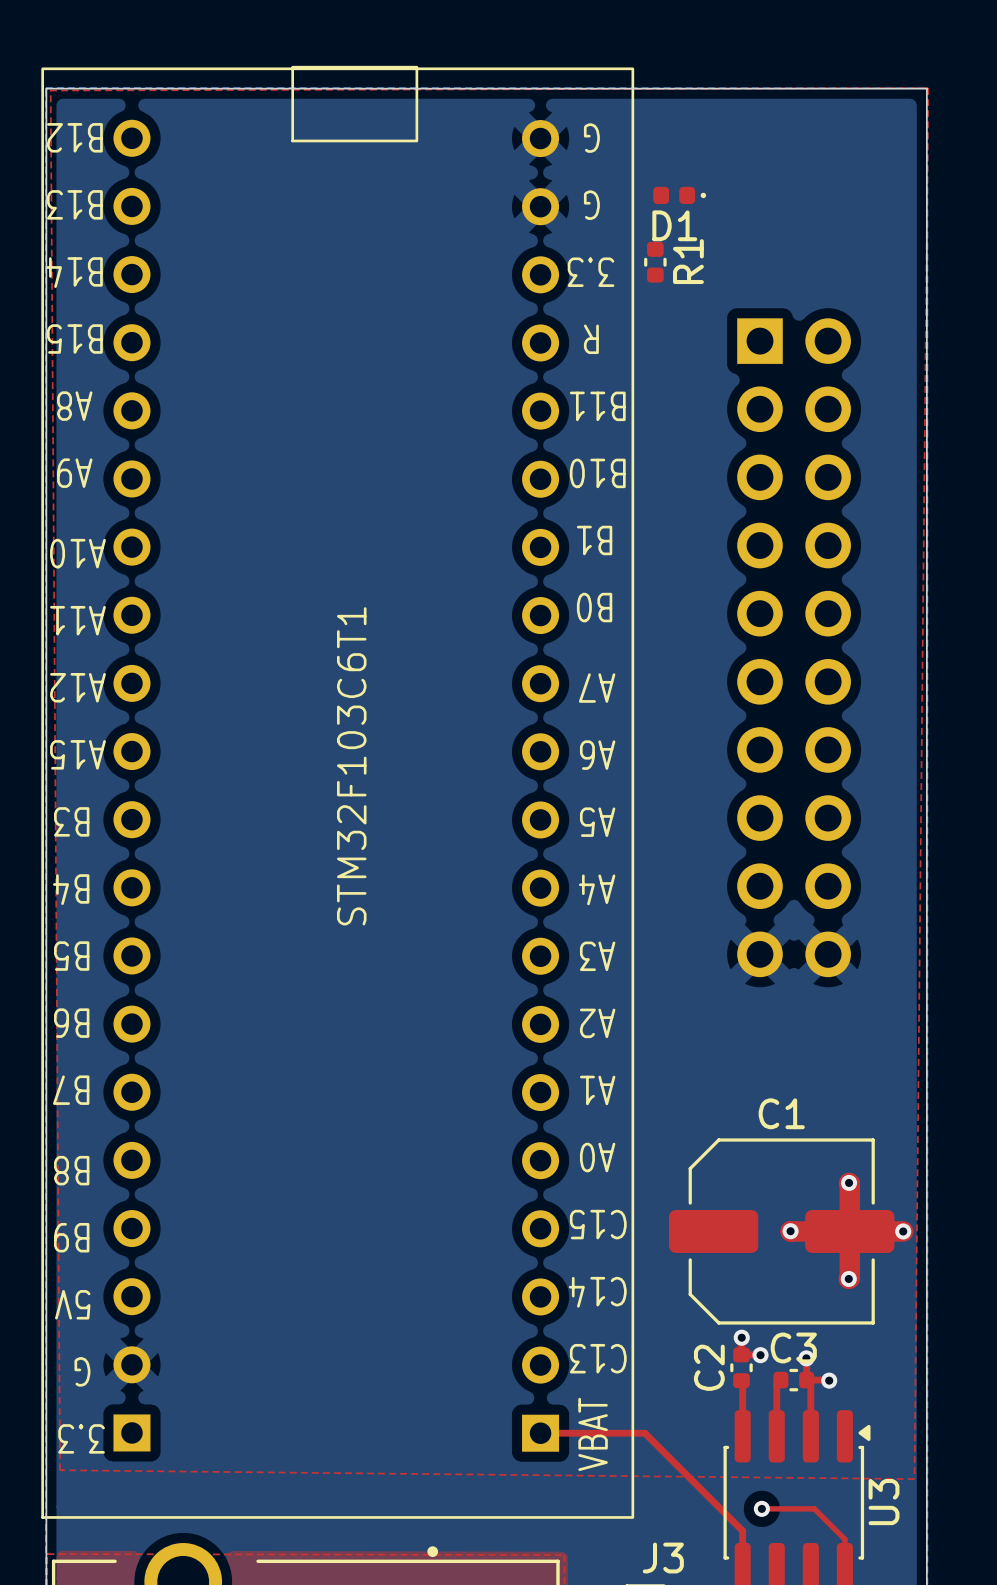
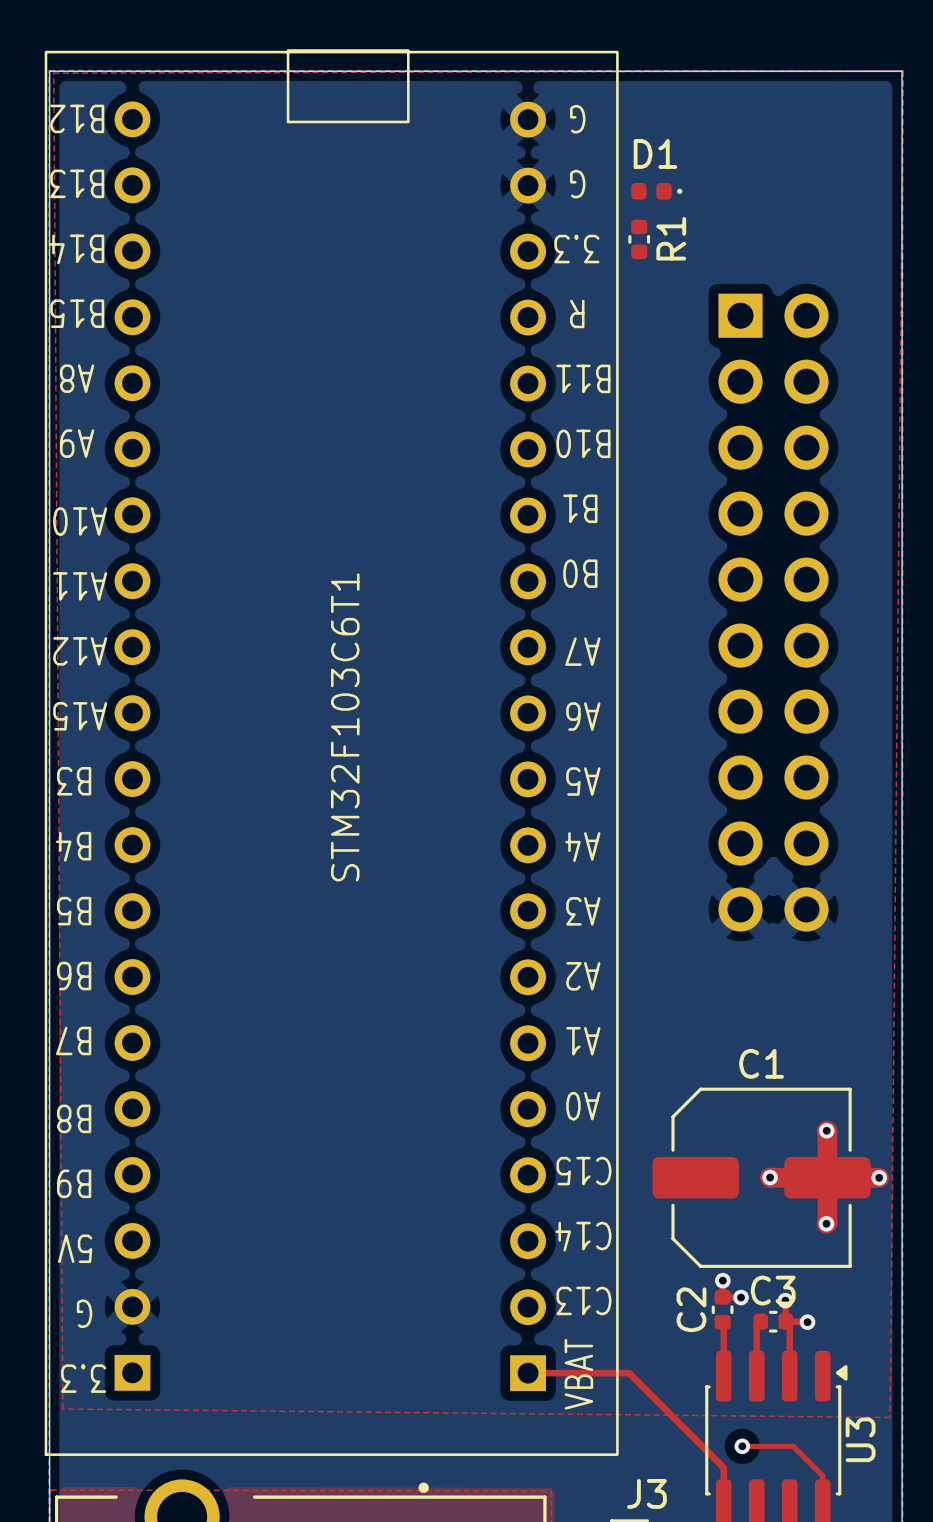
D1 position: (679, 195) -> (656, 191)
D1 name position: D1 (674, 225) -> D1 (655, 153)

